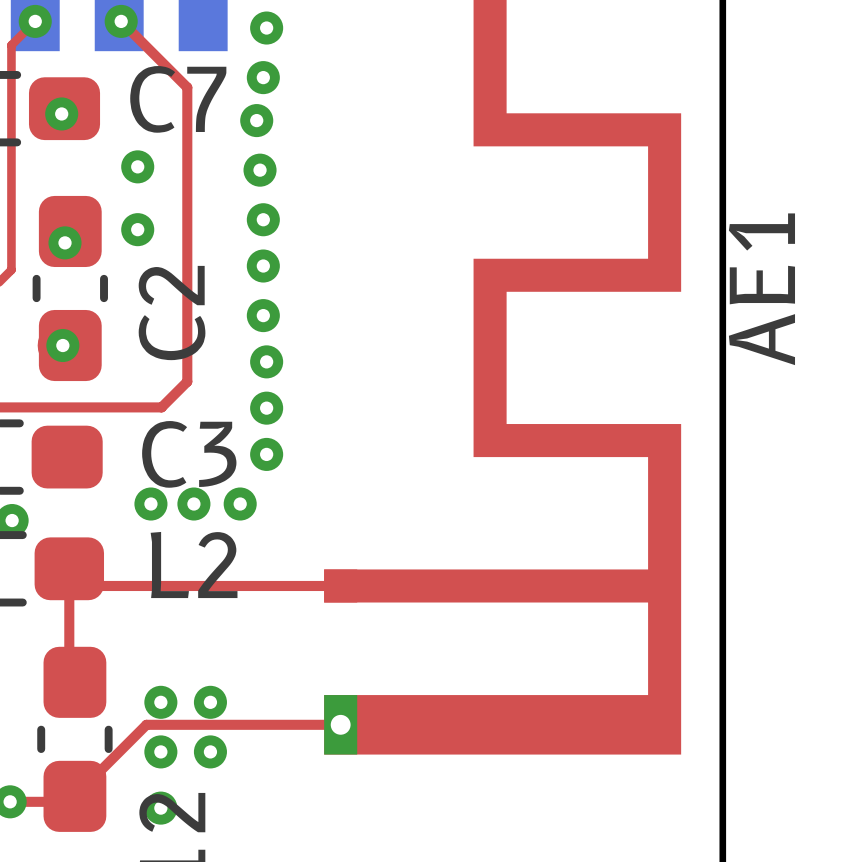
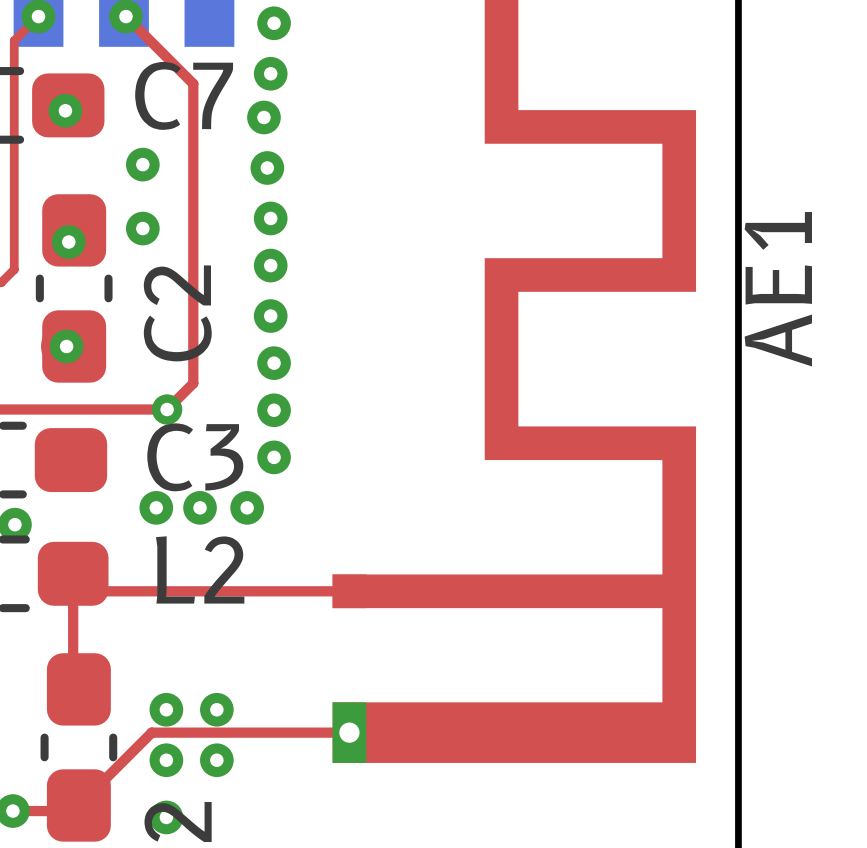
via: none -> (167, 409)

